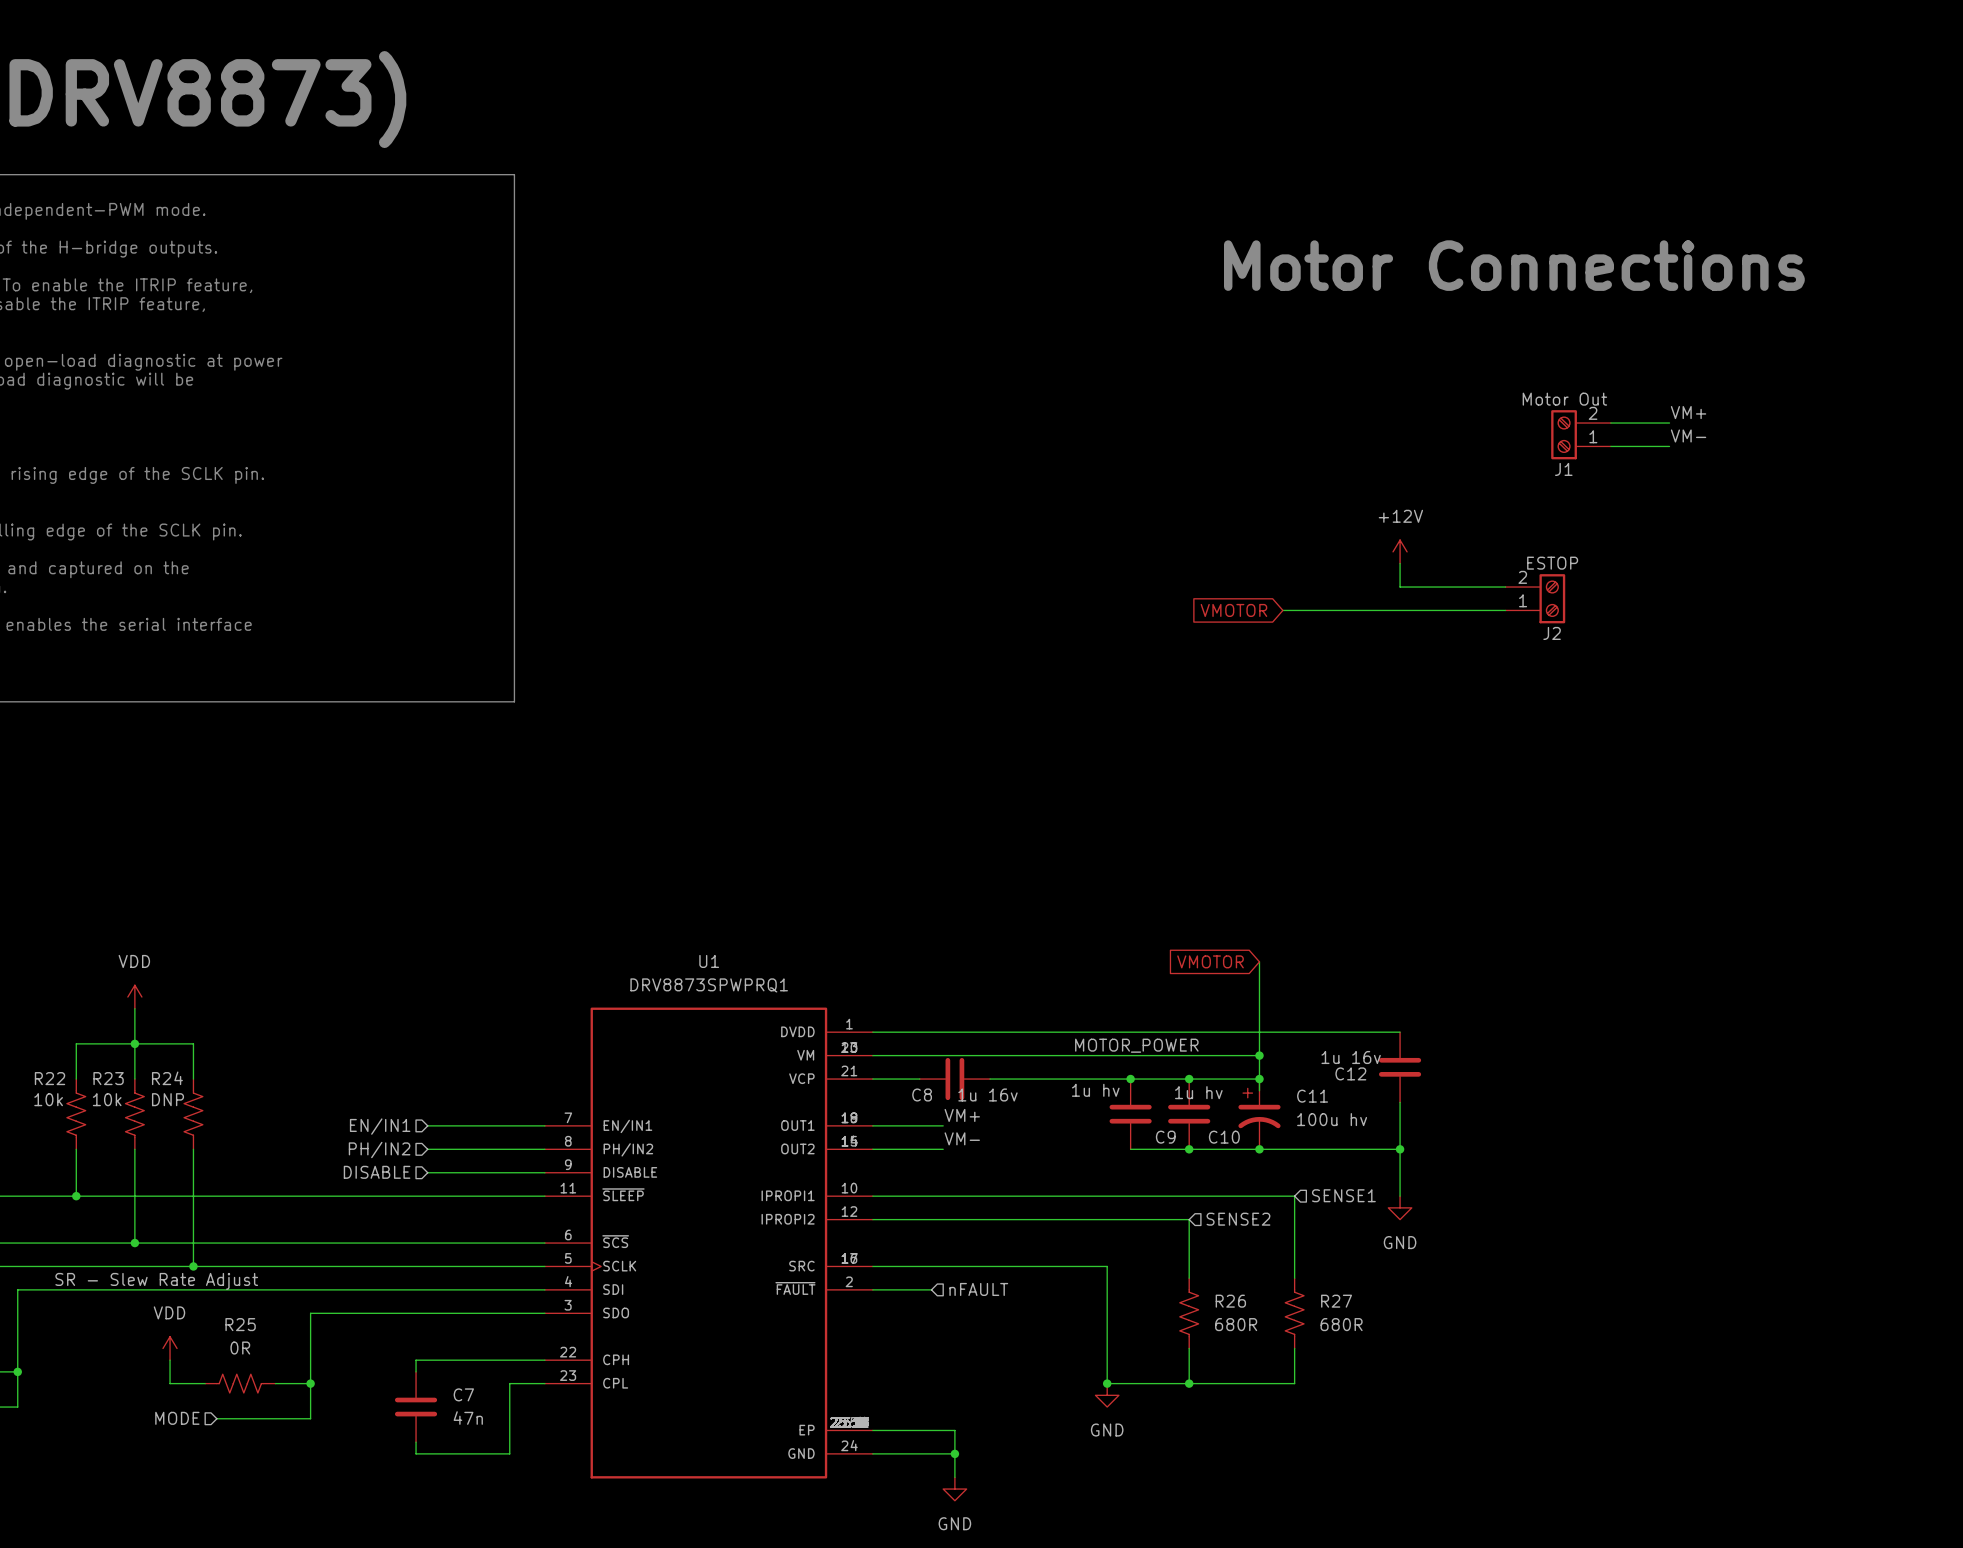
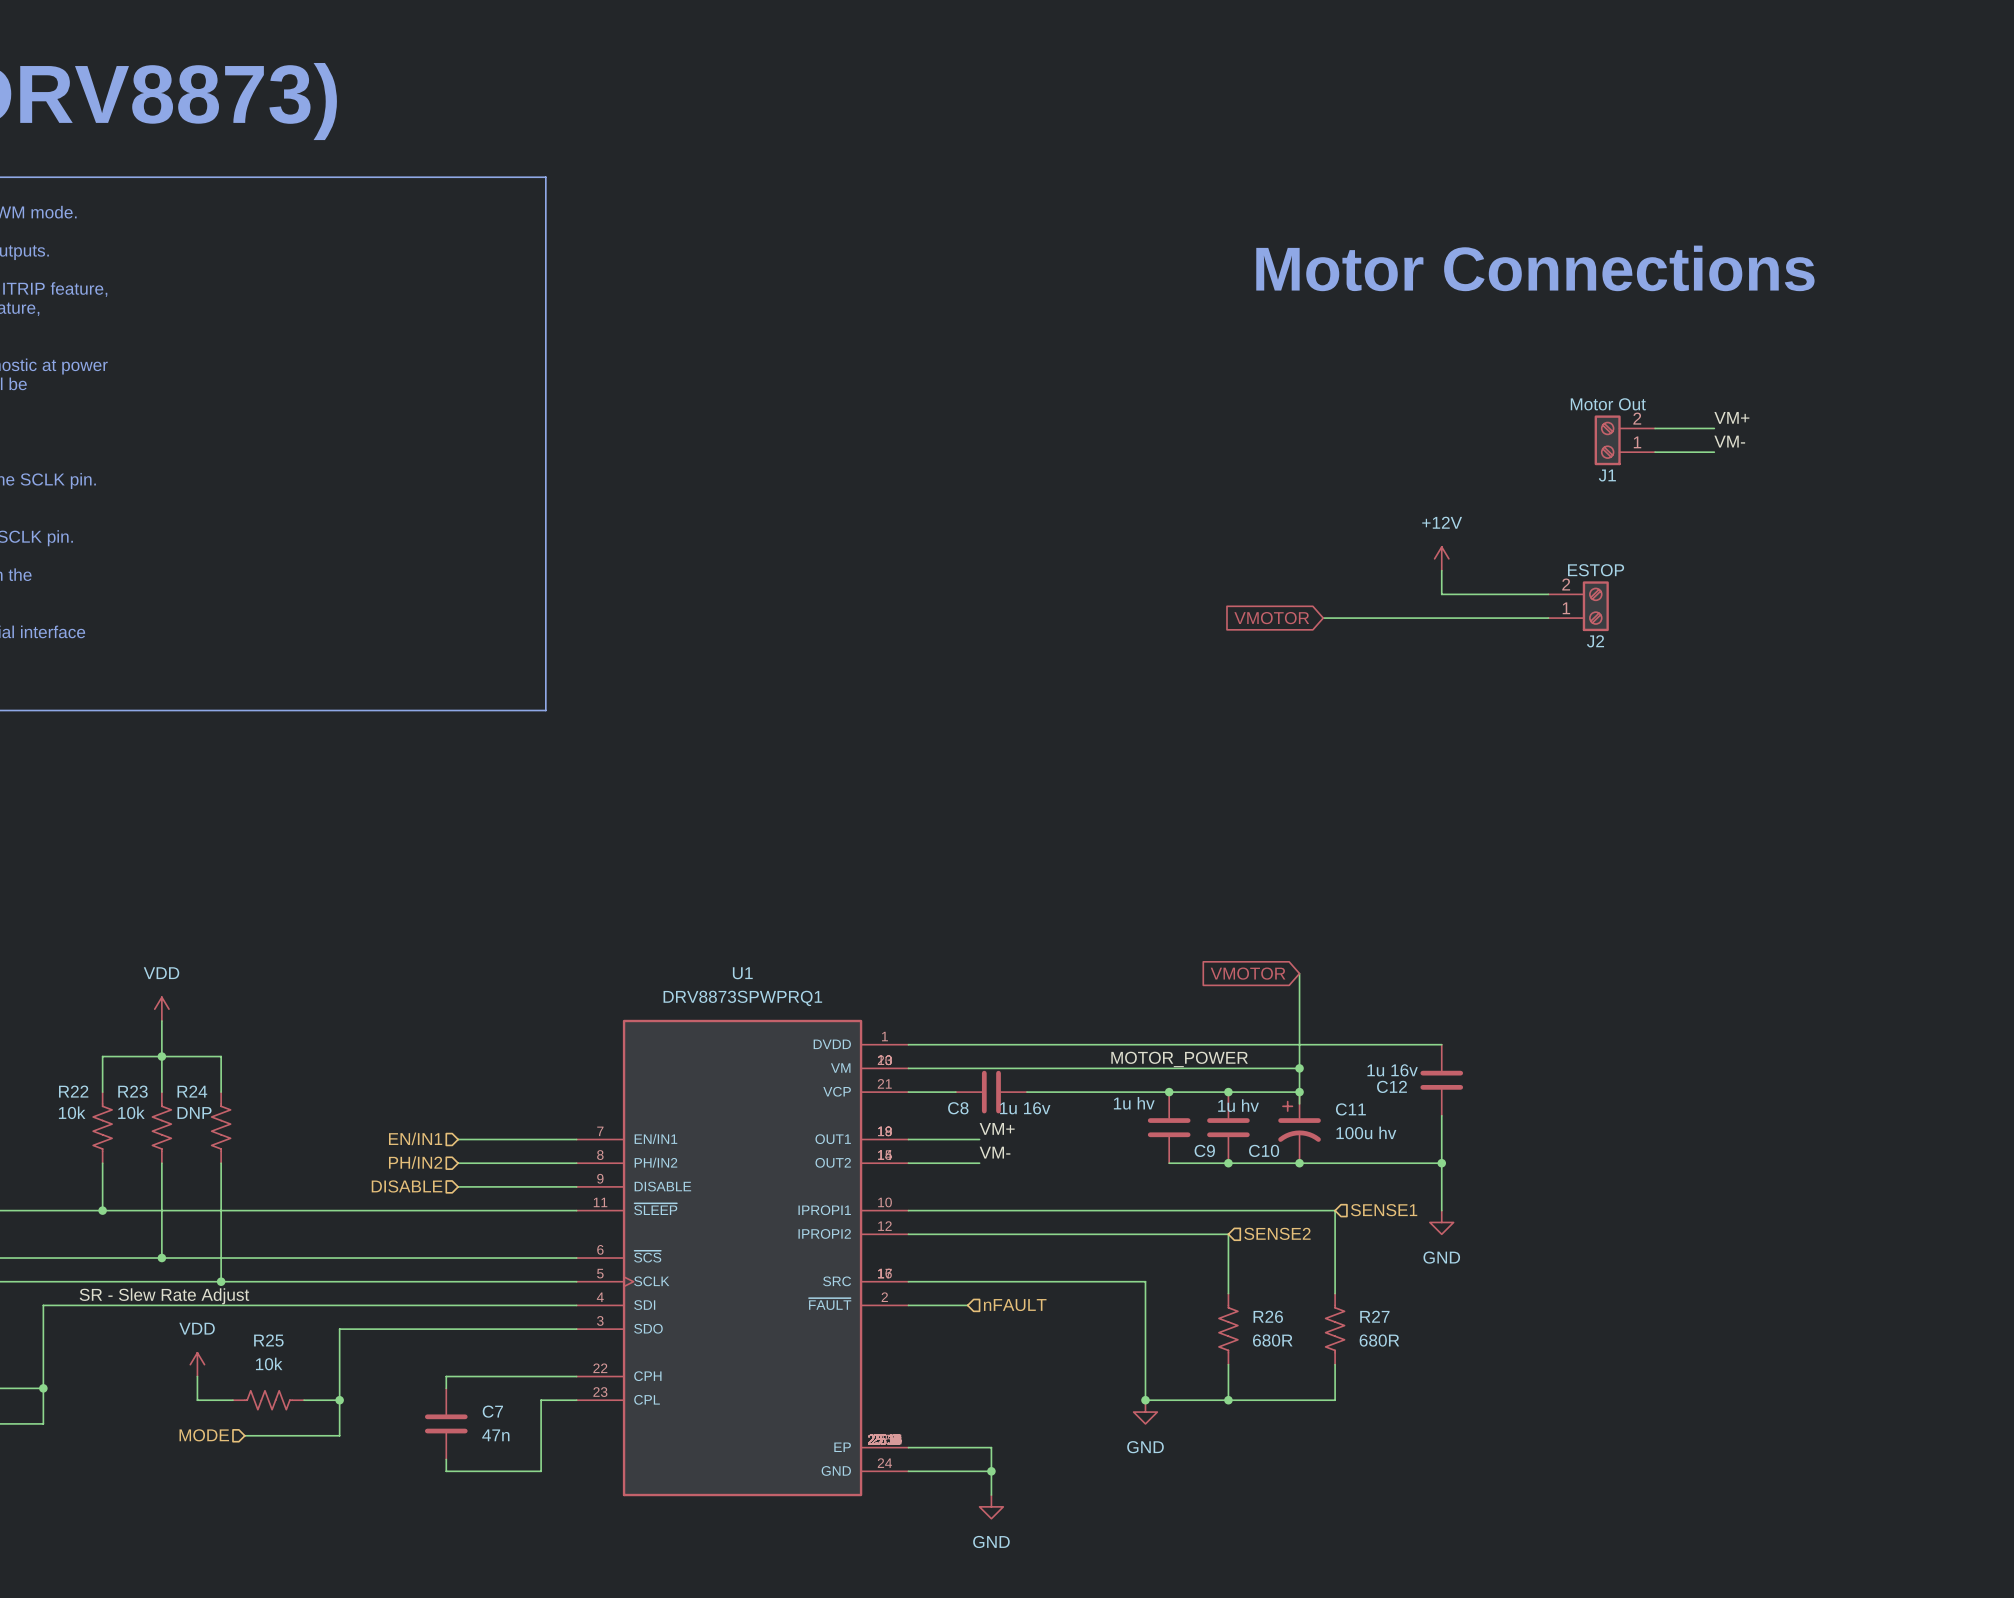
R25 value: 0R (240, 1348) -> 10k (269, 1363)

